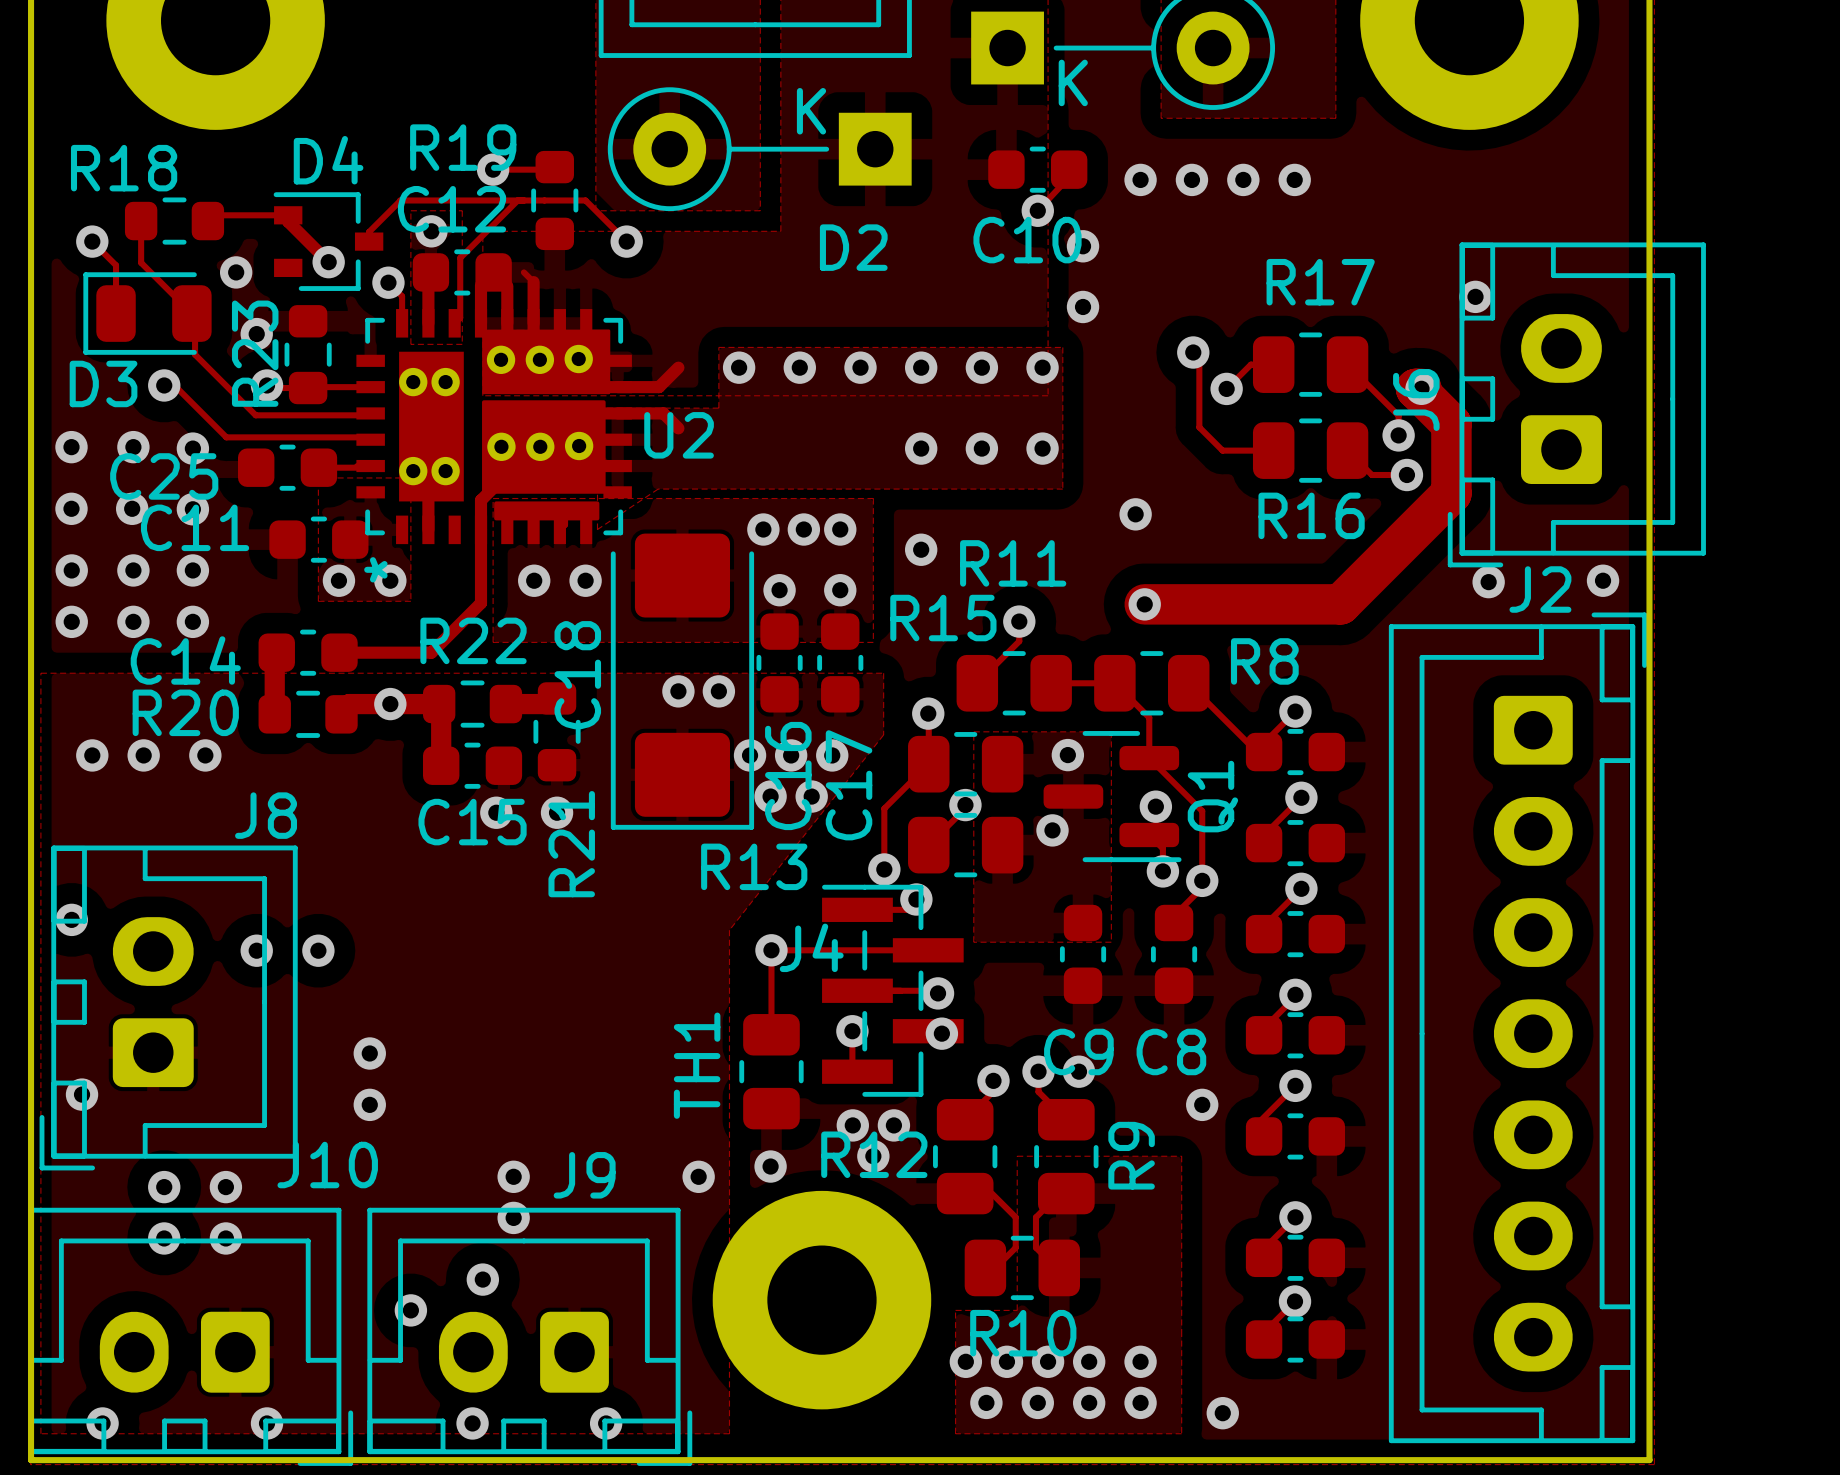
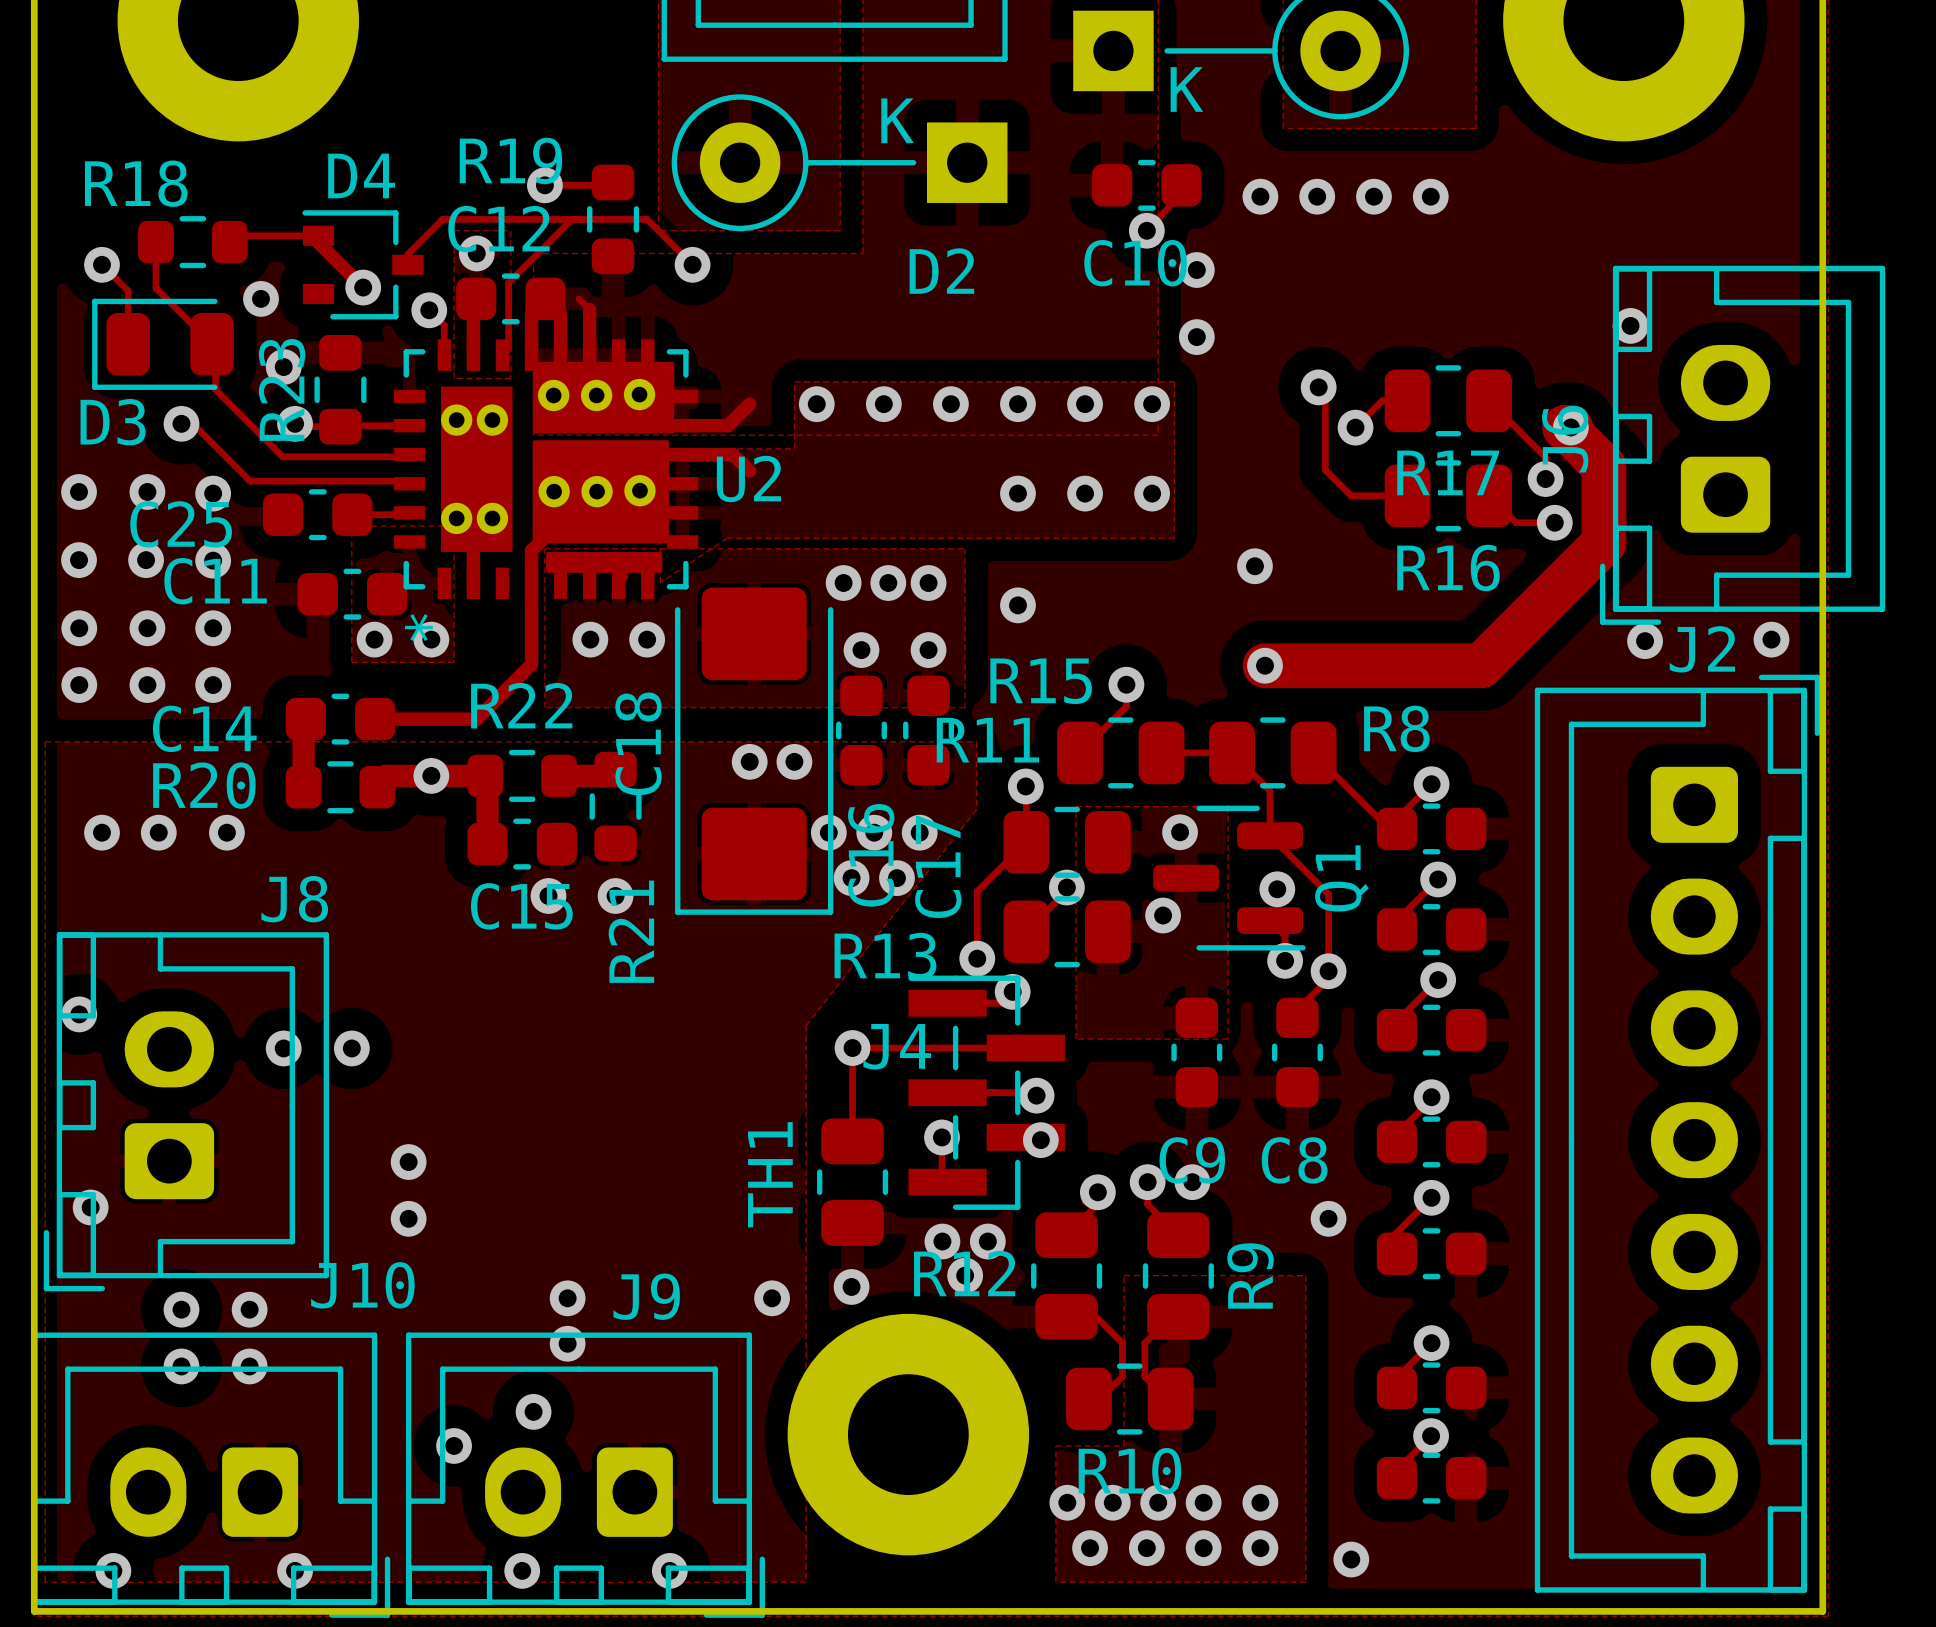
R17 name position: R17 (1320, 282) -> R17 (1448, 472)
R11 name position: R11 (1013, 563) -> R11 (987, 740)
R13 name position: R13 (754, 866) -> R13 (885, 955)

